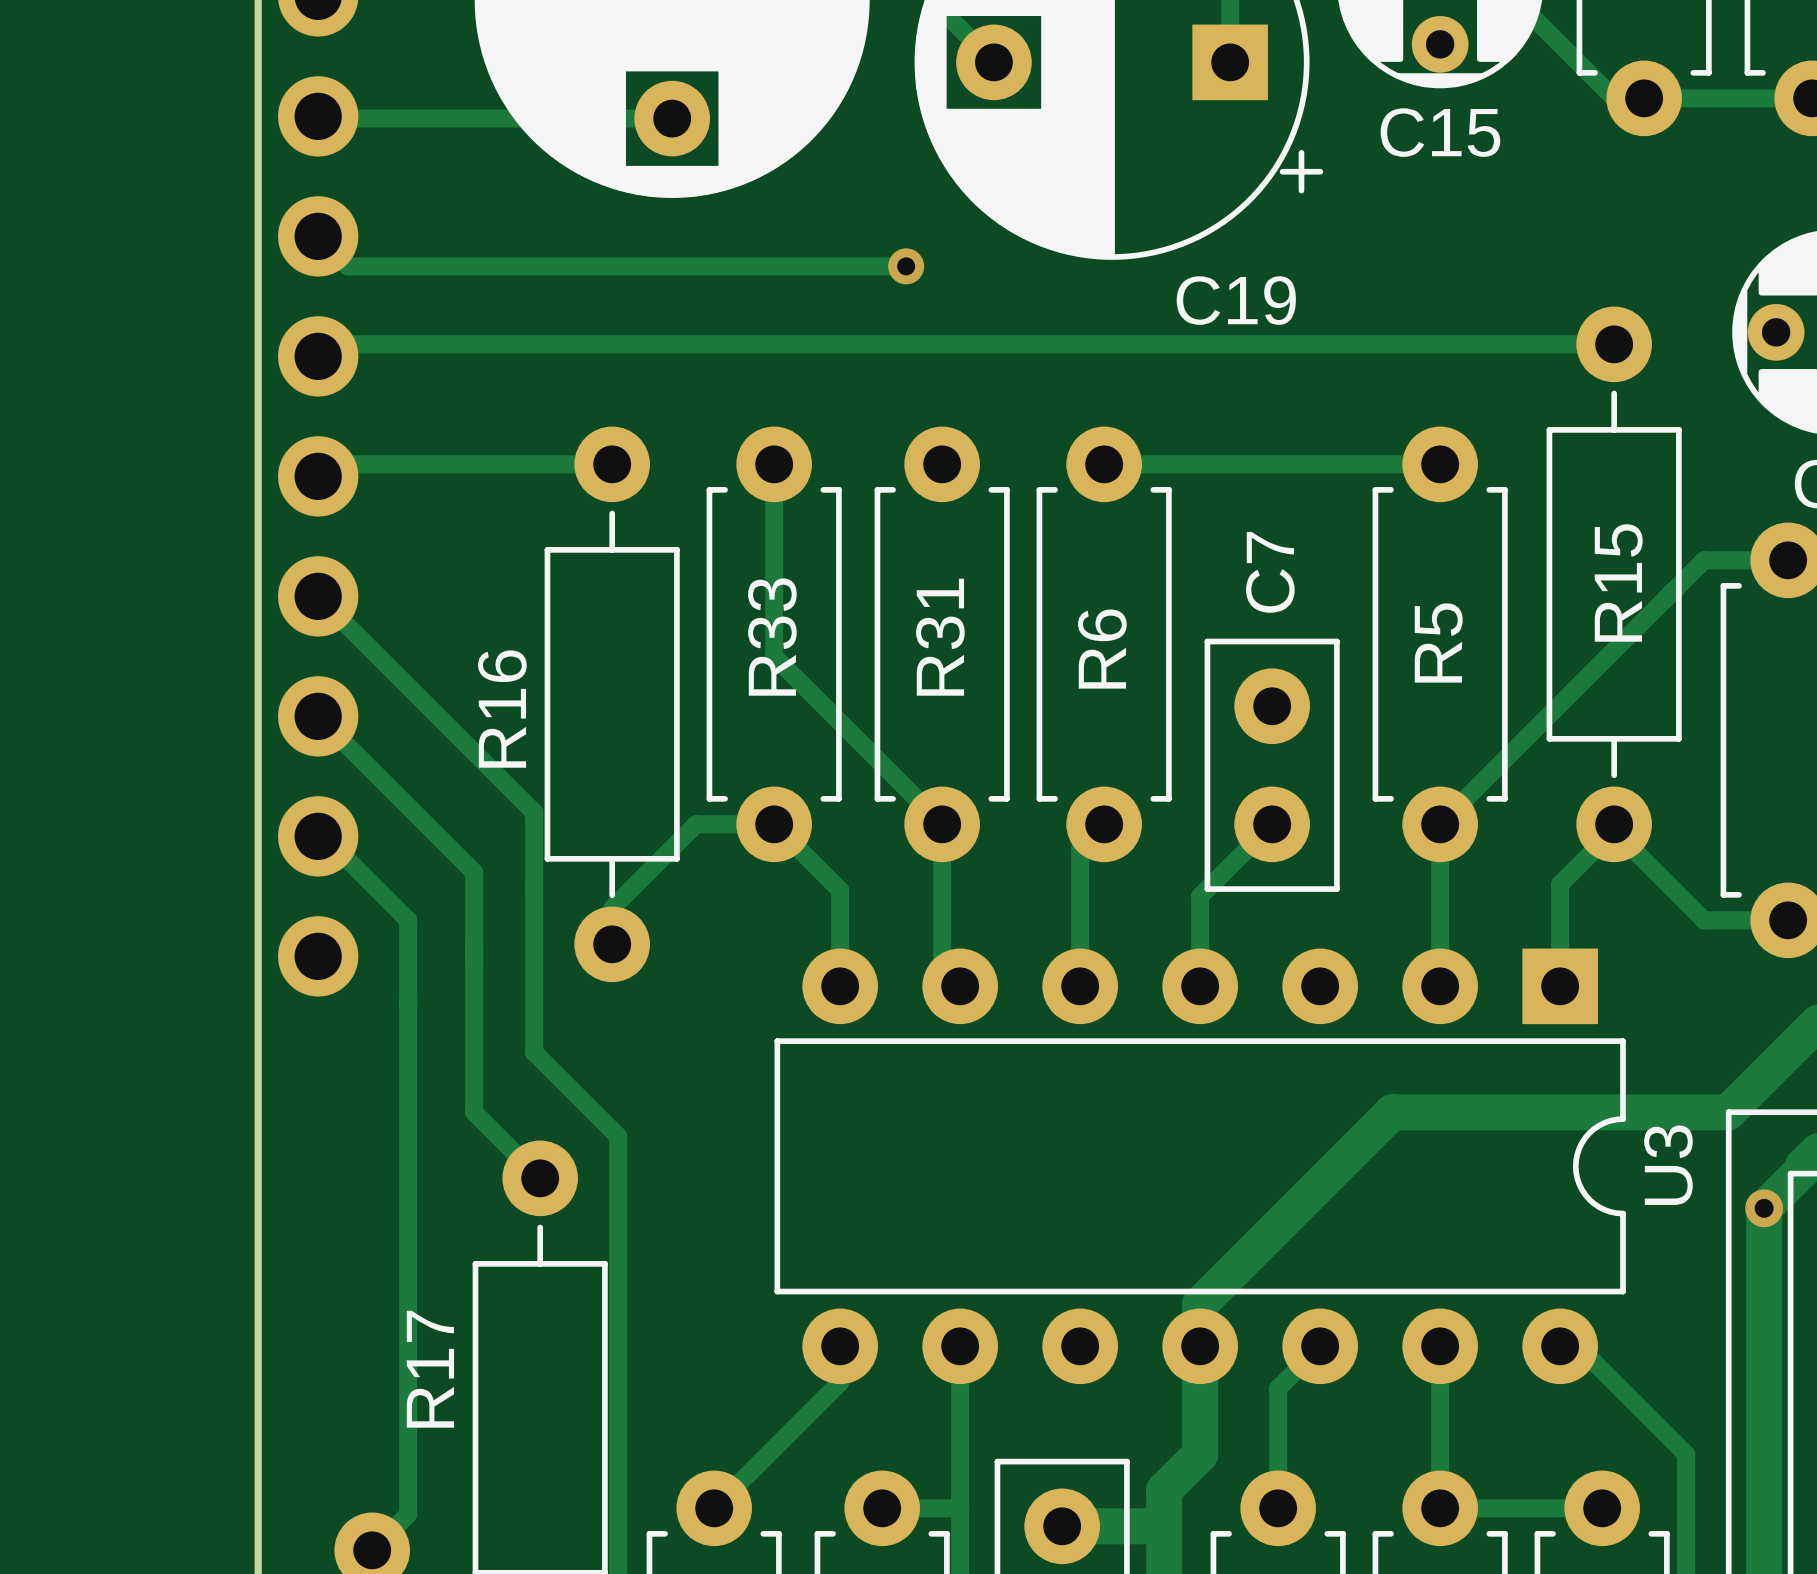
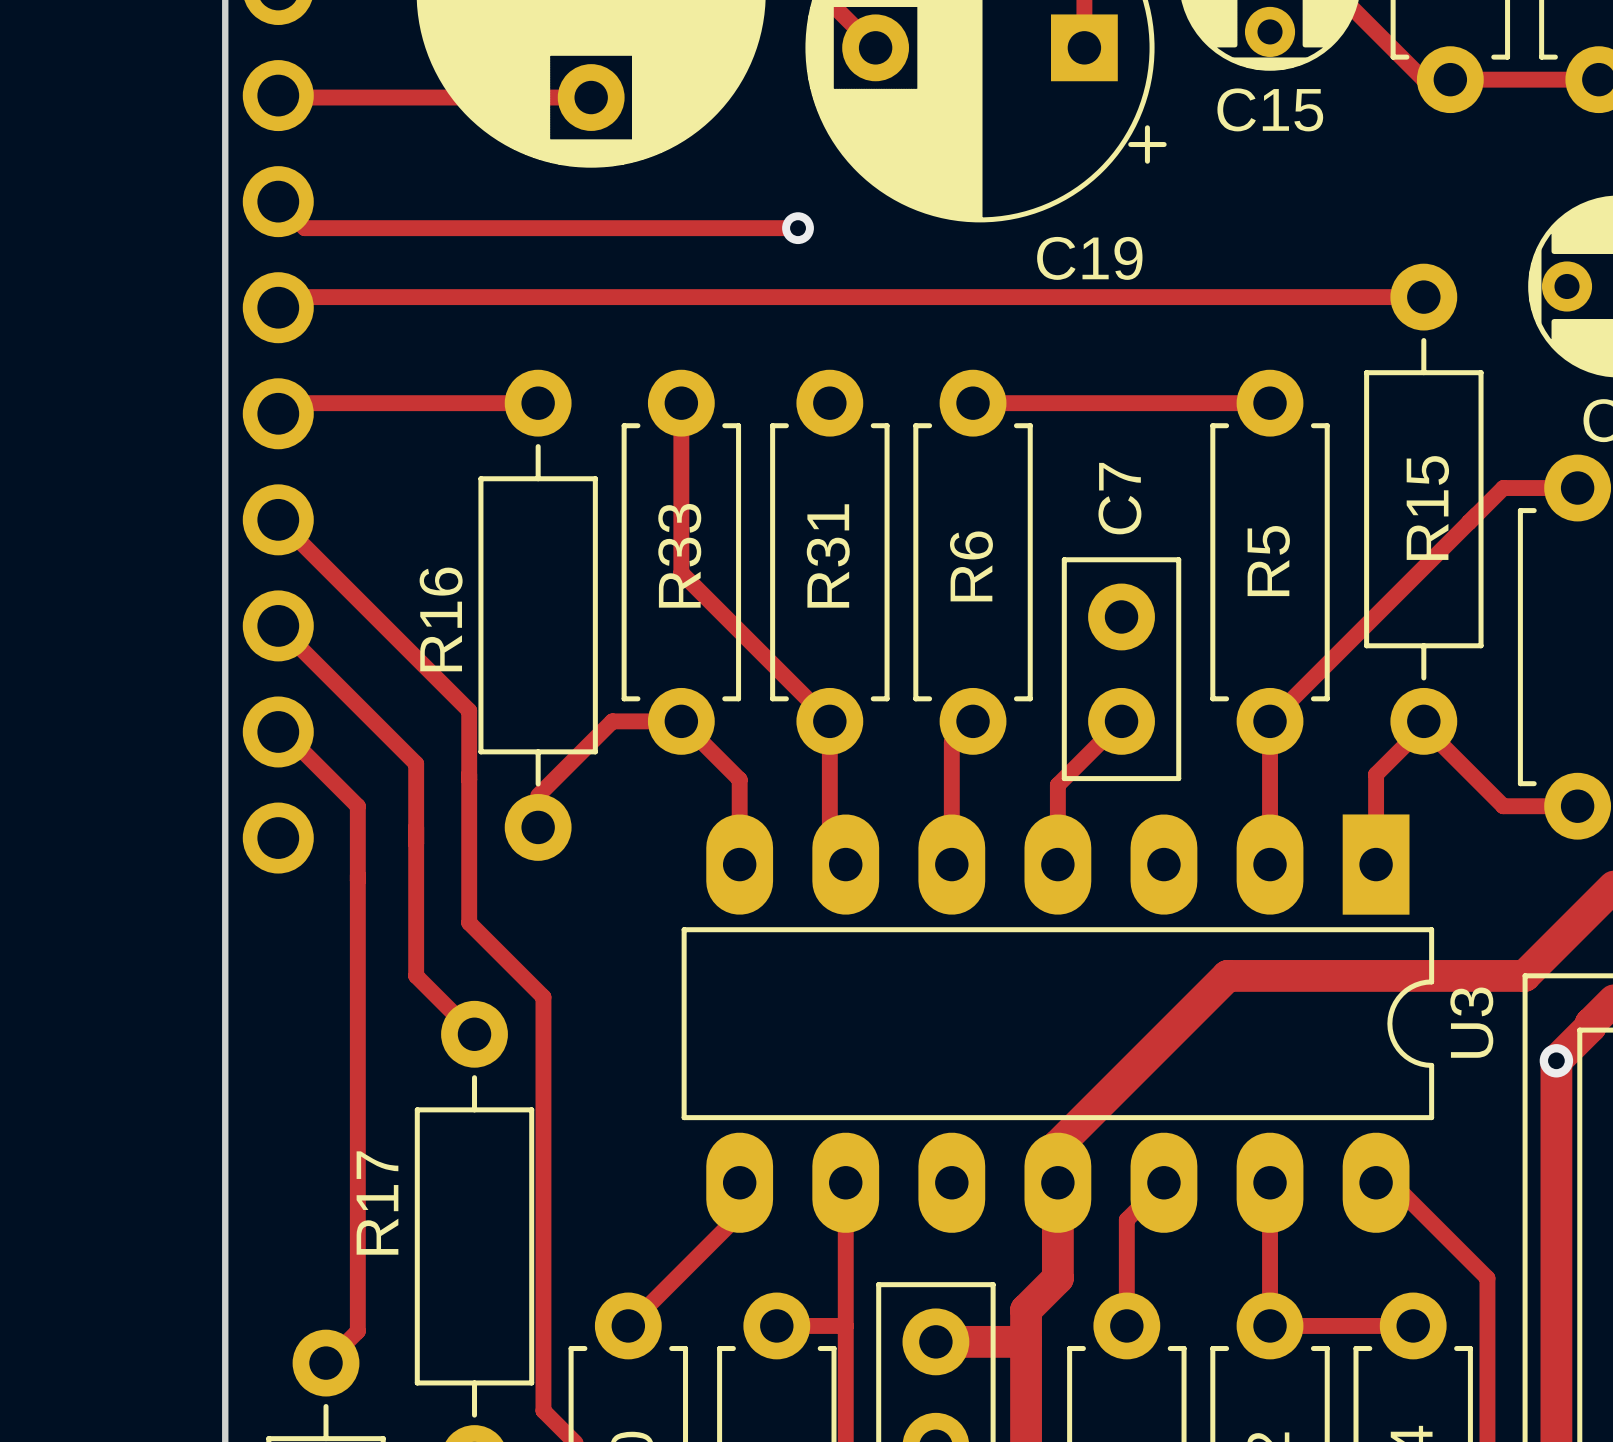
U3 footprint: [774, 948, 1626, 1385] -> [681, 814, 1435, 1233]

